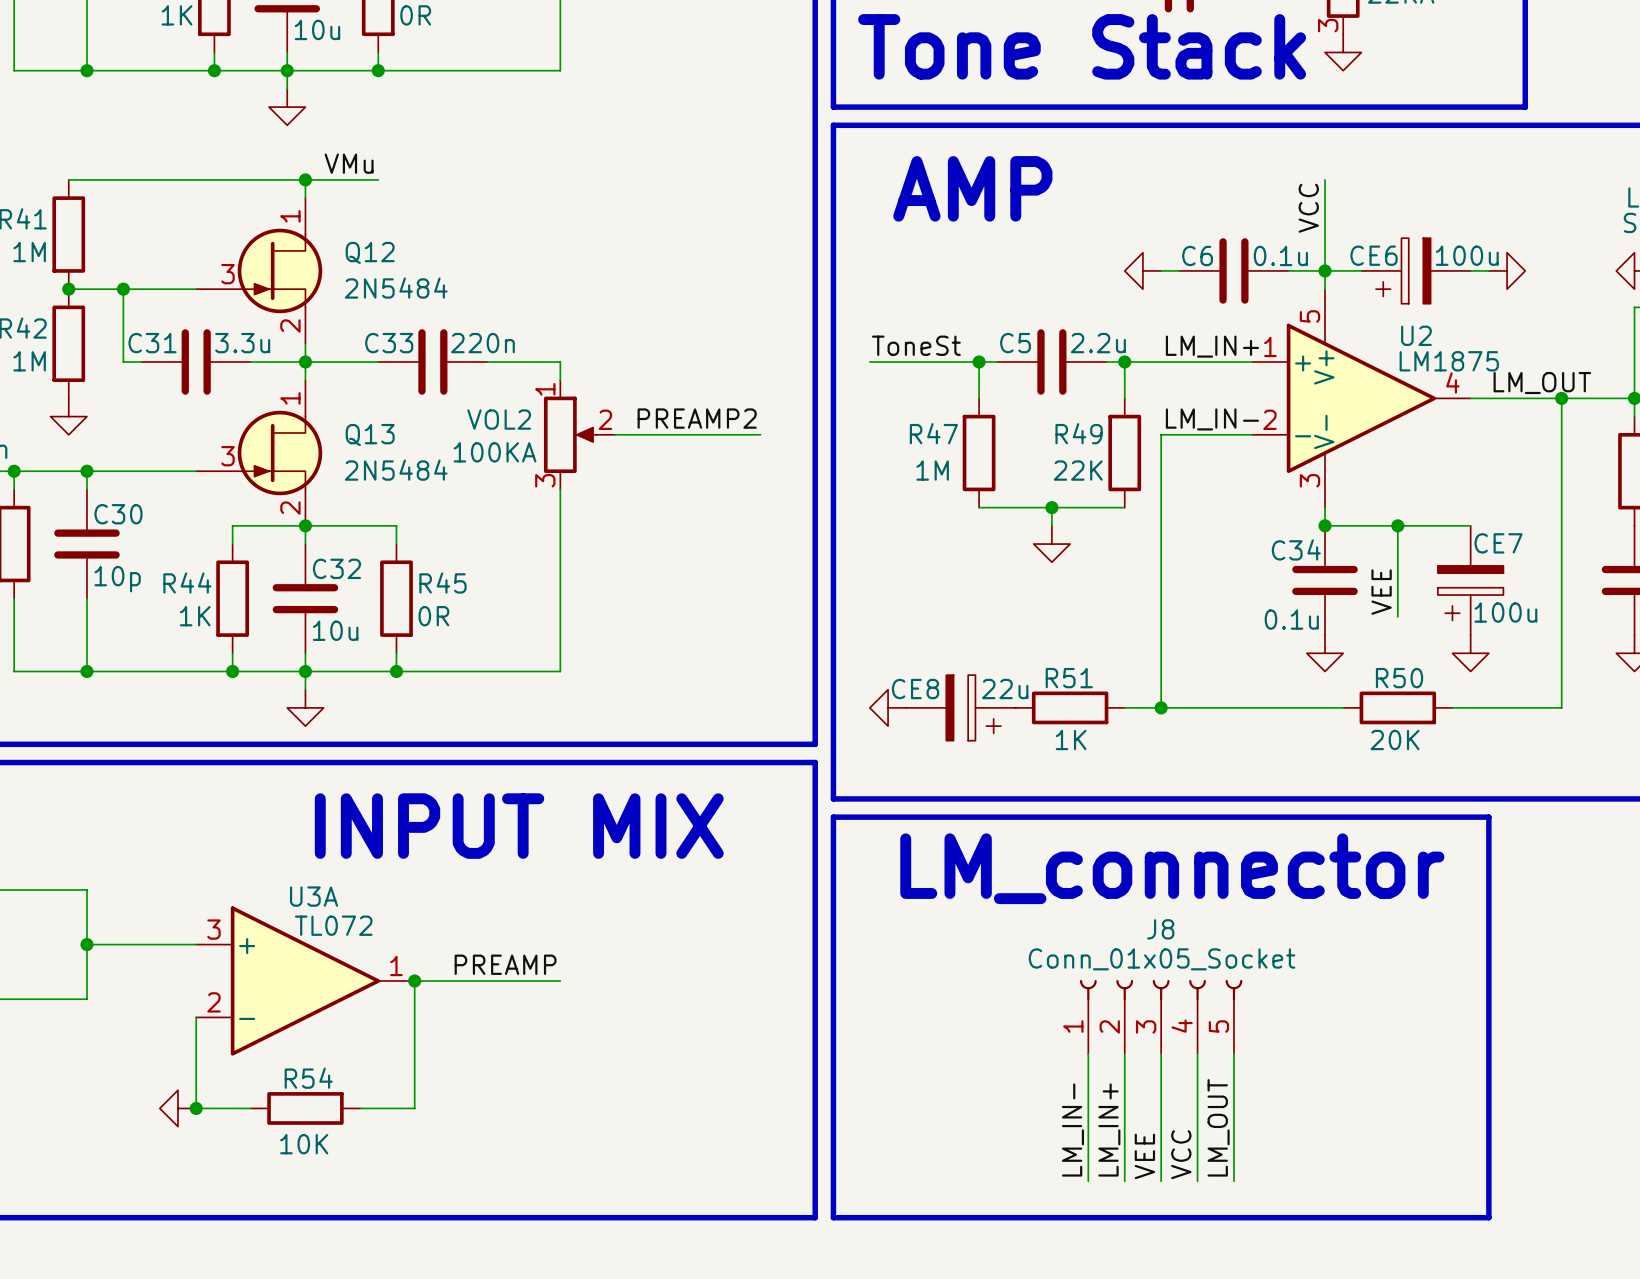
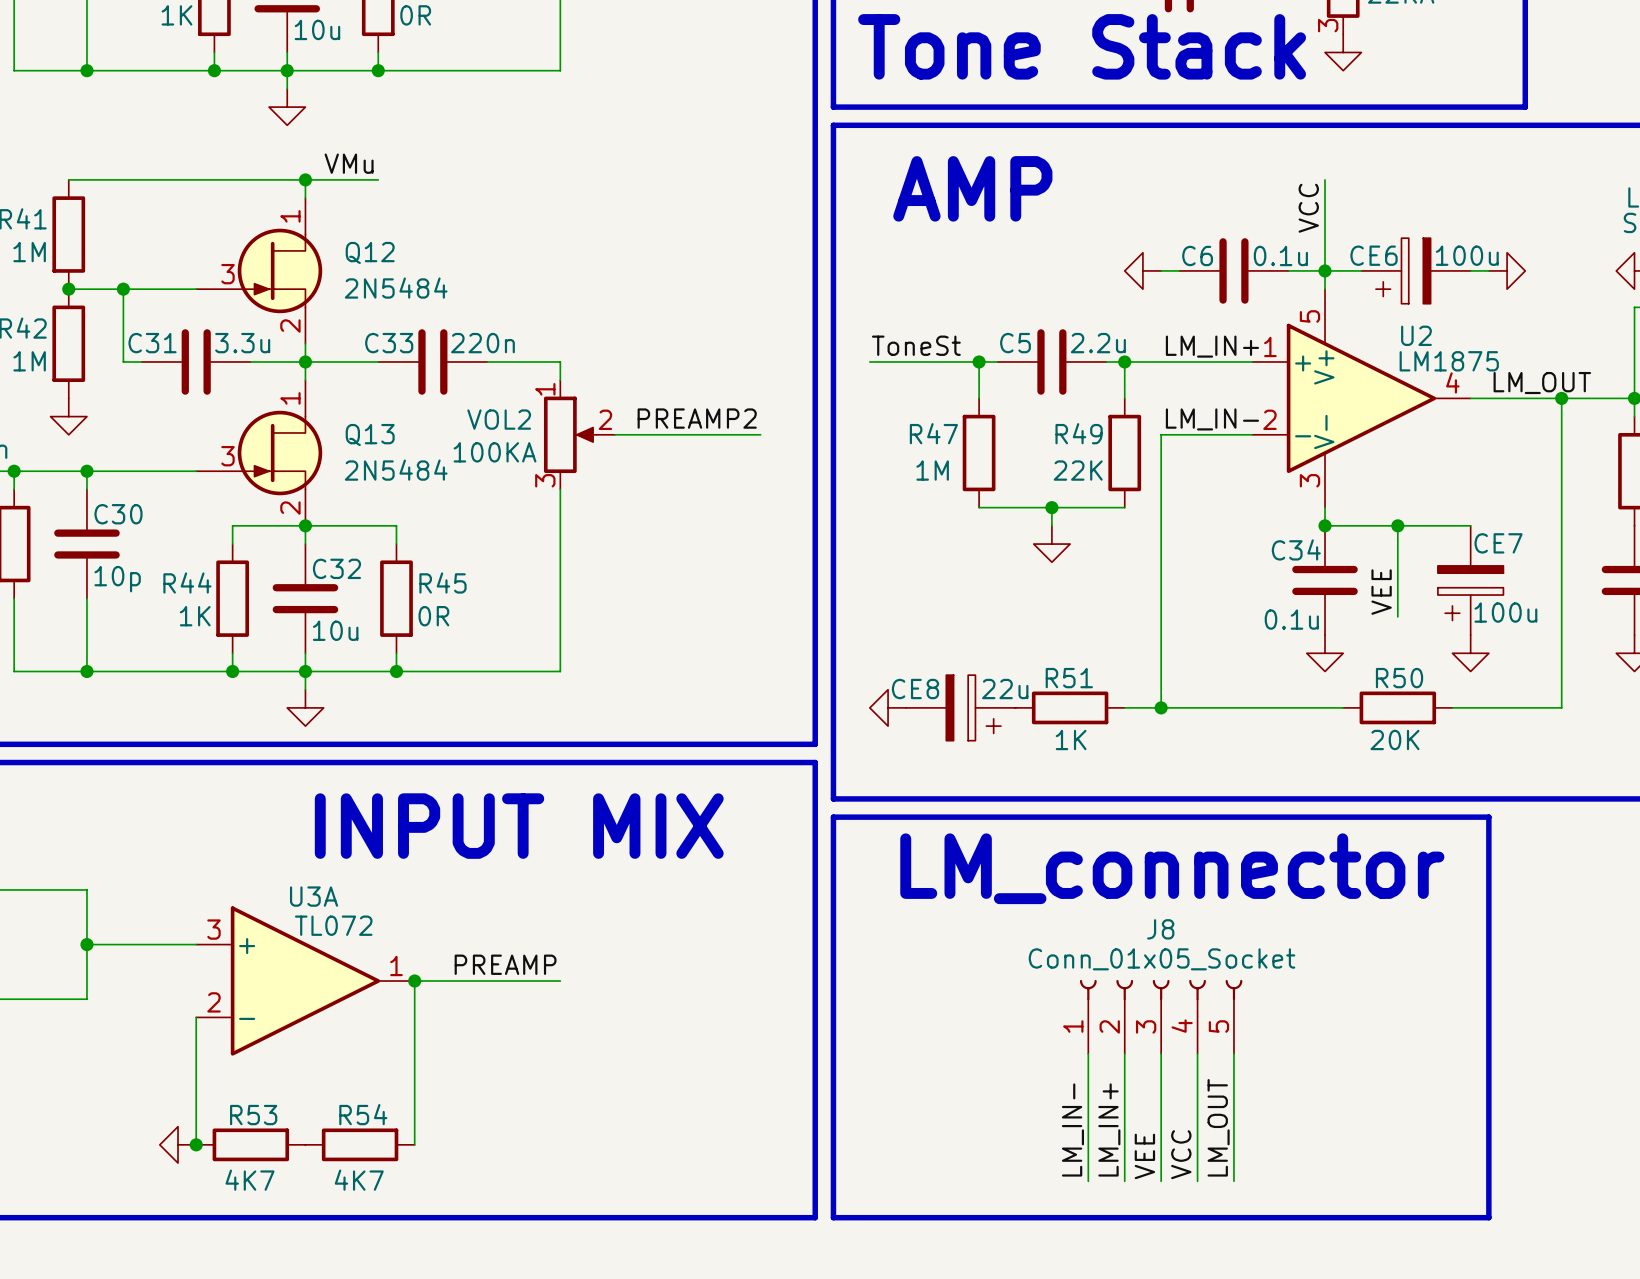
power symbol position: (178, 1108) -> (178, 1144)
wire: (196, 1108) (250, 1108) -> (196, 1108) (196, 1144)
junction position: (196, 1108) -> (196, 1144)
R54 position: (305, 1108) -> (360, 1144)
wire: (360, 1108) (414, 1108) -> (414, 1144) (414, 1108)
R53: none -> 4K7 (250, 1144)
R54 value: 10K (304, 1144) -> 4K7 (359, 1180)

